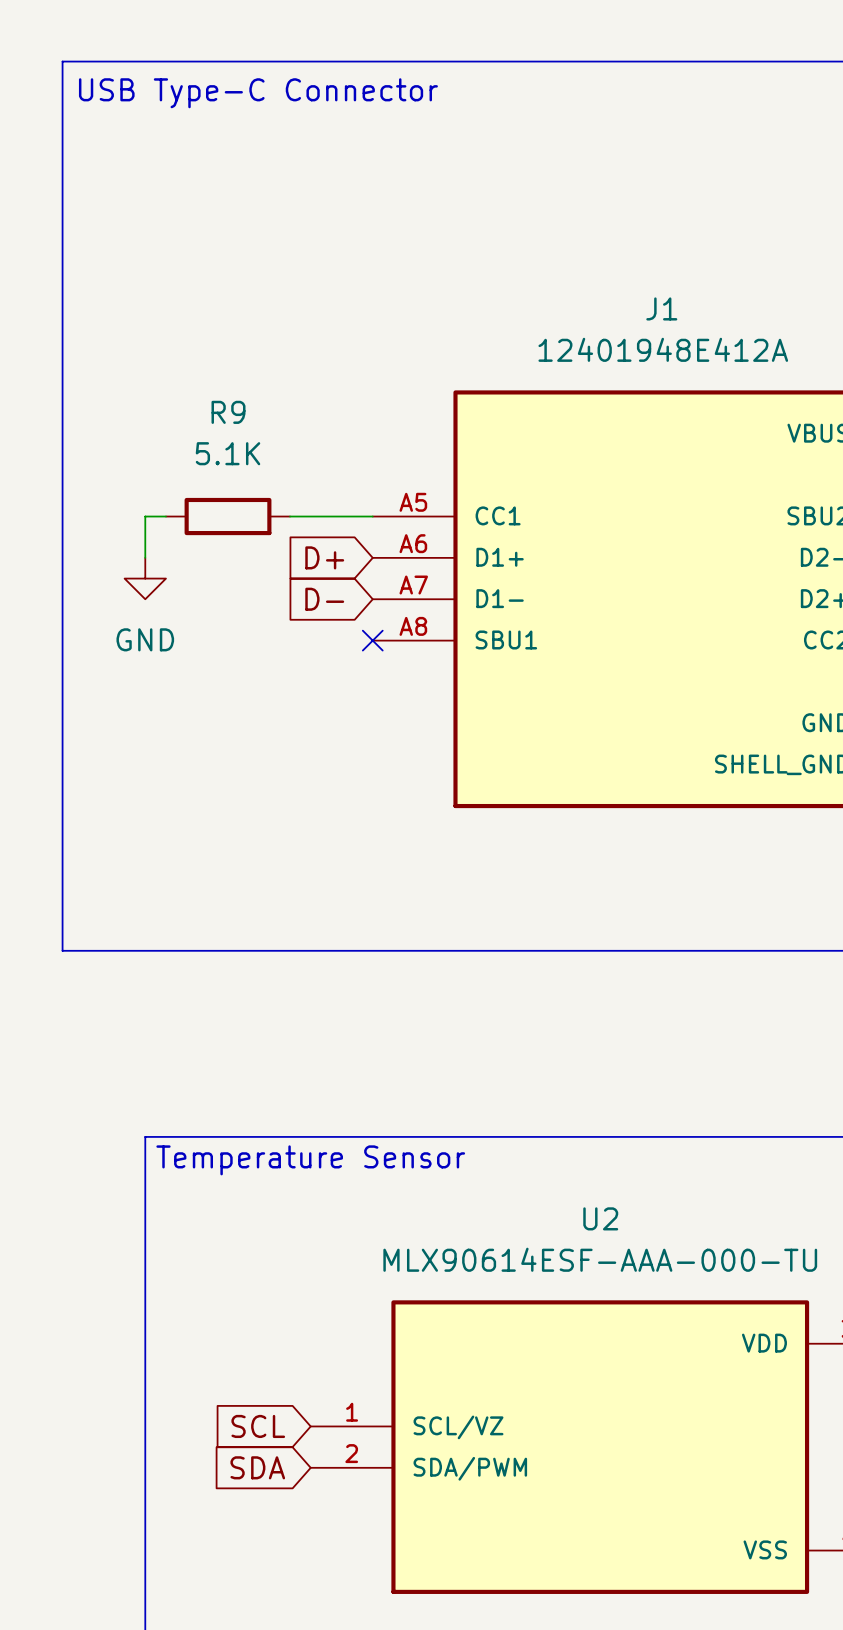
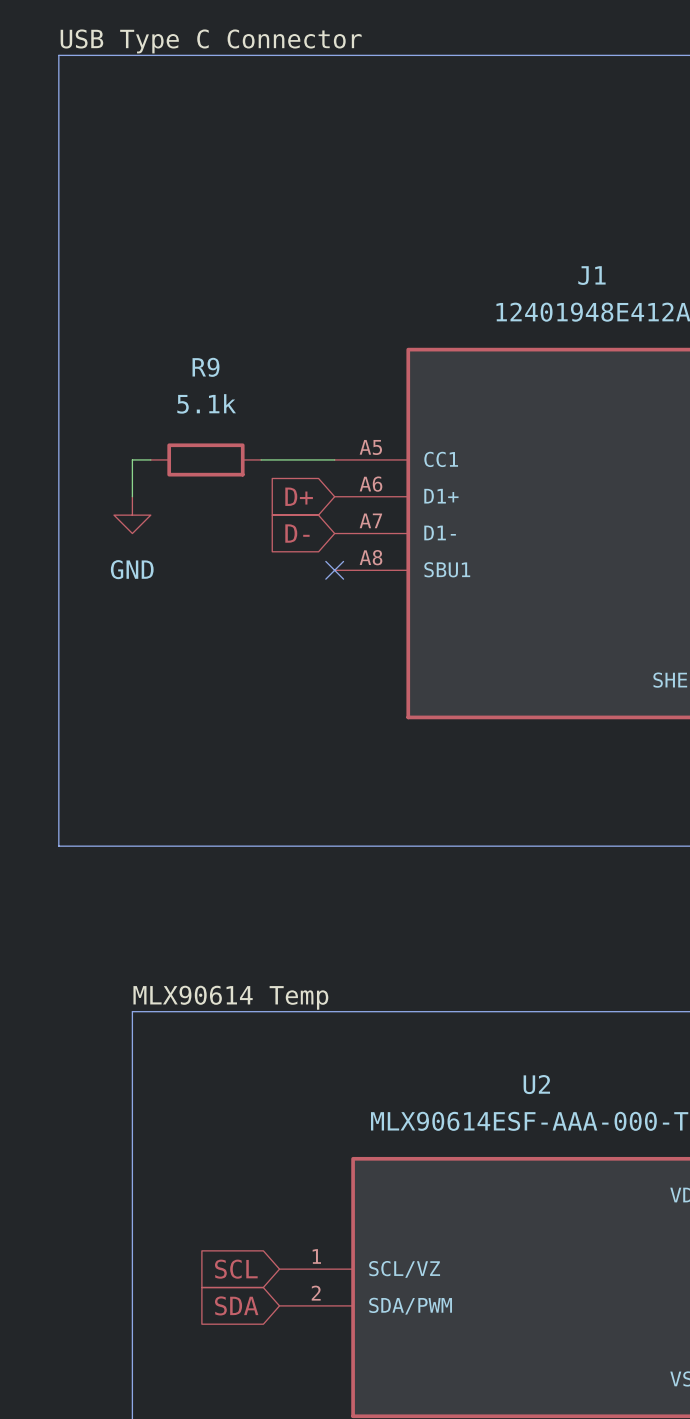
label: none -> USB Type C Connector (211, 41)
text: USB Type-C Connector (258, 93) -> none
R9 value: 5.1K (228, 453) -> 5.1k (206, 403)
label: none -> MLX90614 Temp (230, 997)
text: Temperature Sensor (310, 1160) -> none

